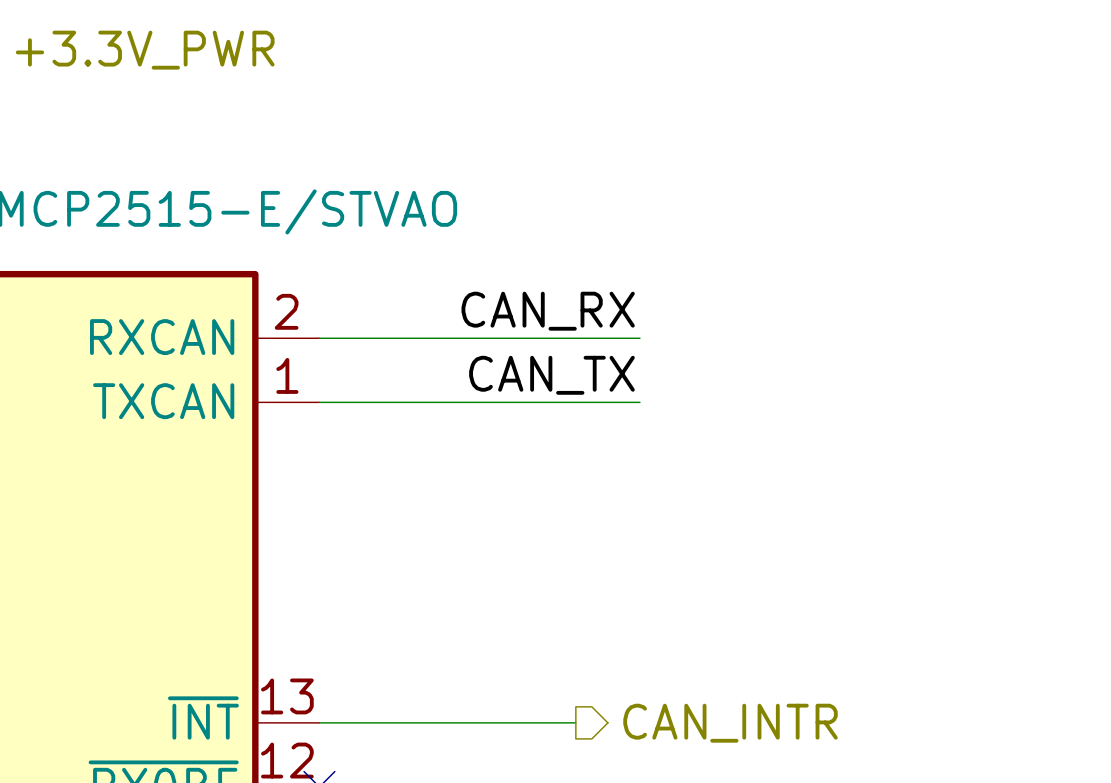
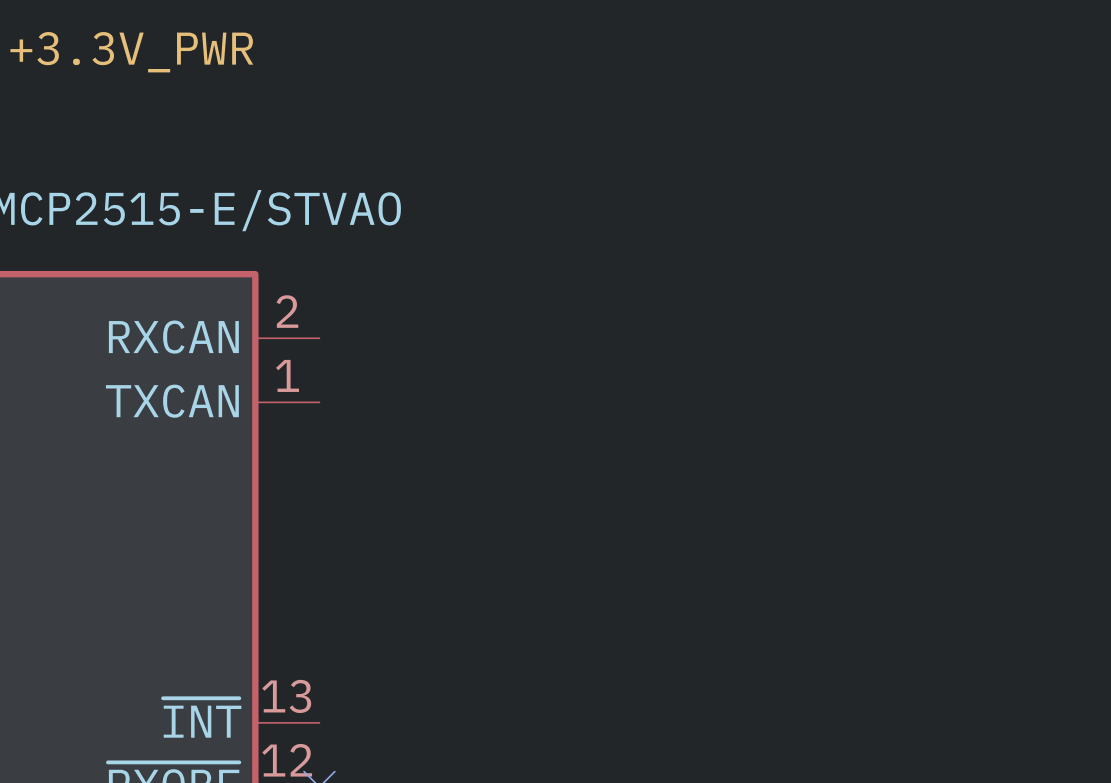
label: CAN_RX (548, 311) -> none
wire: (319, 338) (639, 338) -> none
label: CAN_TX (551, 375) -> none
wire: (319, 402) (639, 402) -> none
wire: (319, 722) (575, 722) -> none
hierarchical label: CAN_INTR (730, 723) -> none

